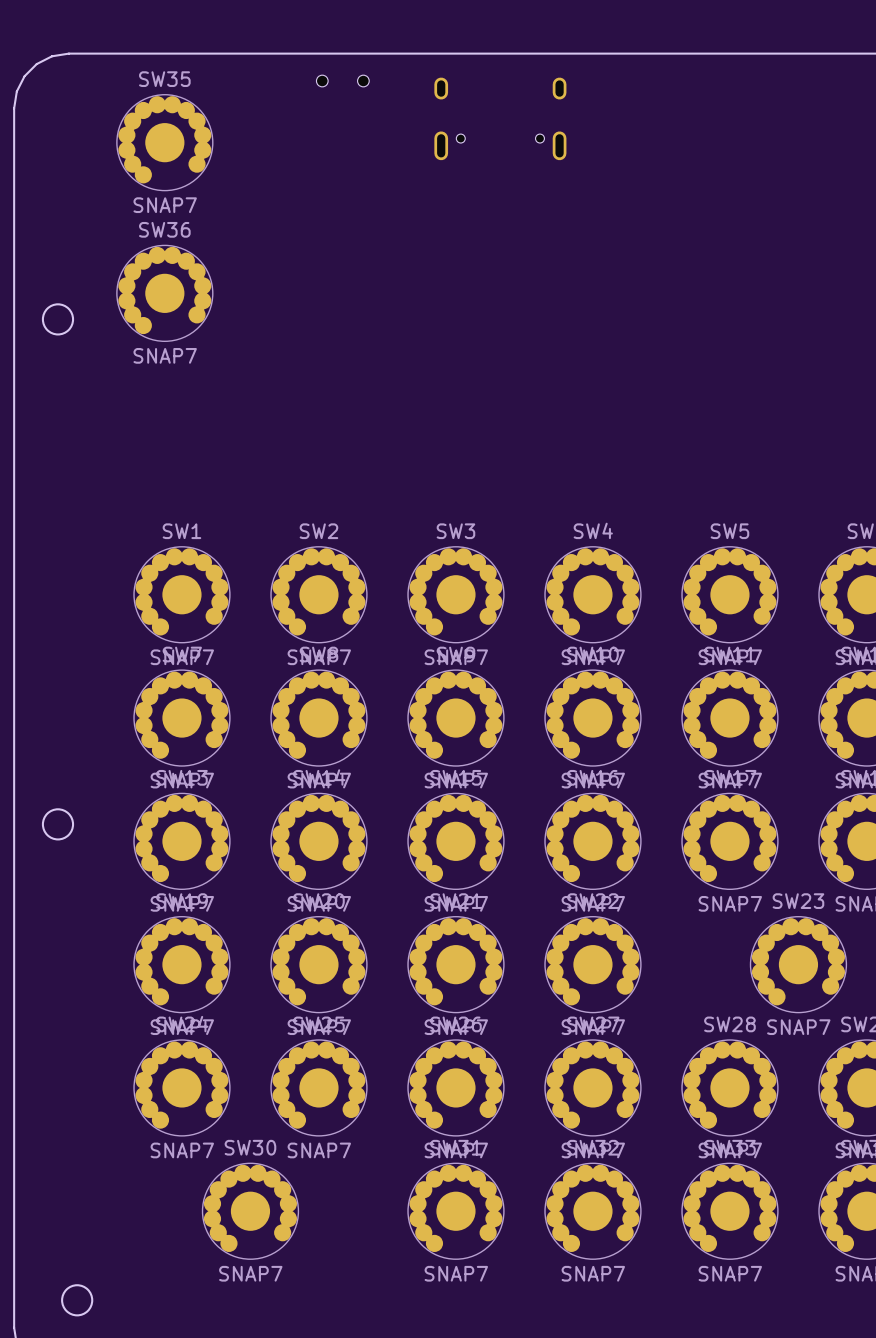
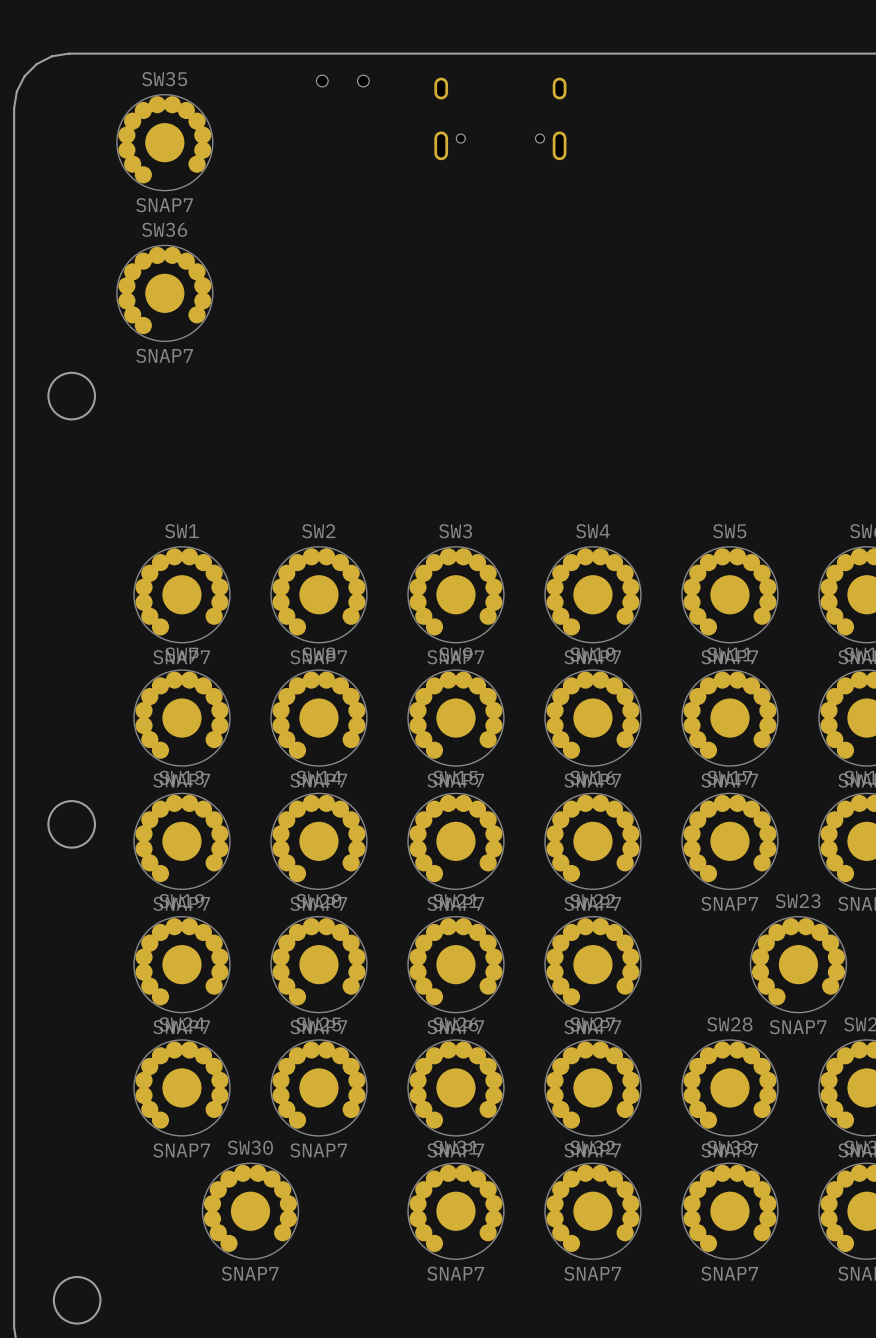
round board edge: [41, 303, 75, 336] -> none
round board edge: none -> [47, 371, 97, 421]
round board edge size: [41, 808, 75, 841] -> [47, 800, 97, 849]
round board edge size: [61, 1284, 94, 1317] -> [52, 1275, 102, 1325]

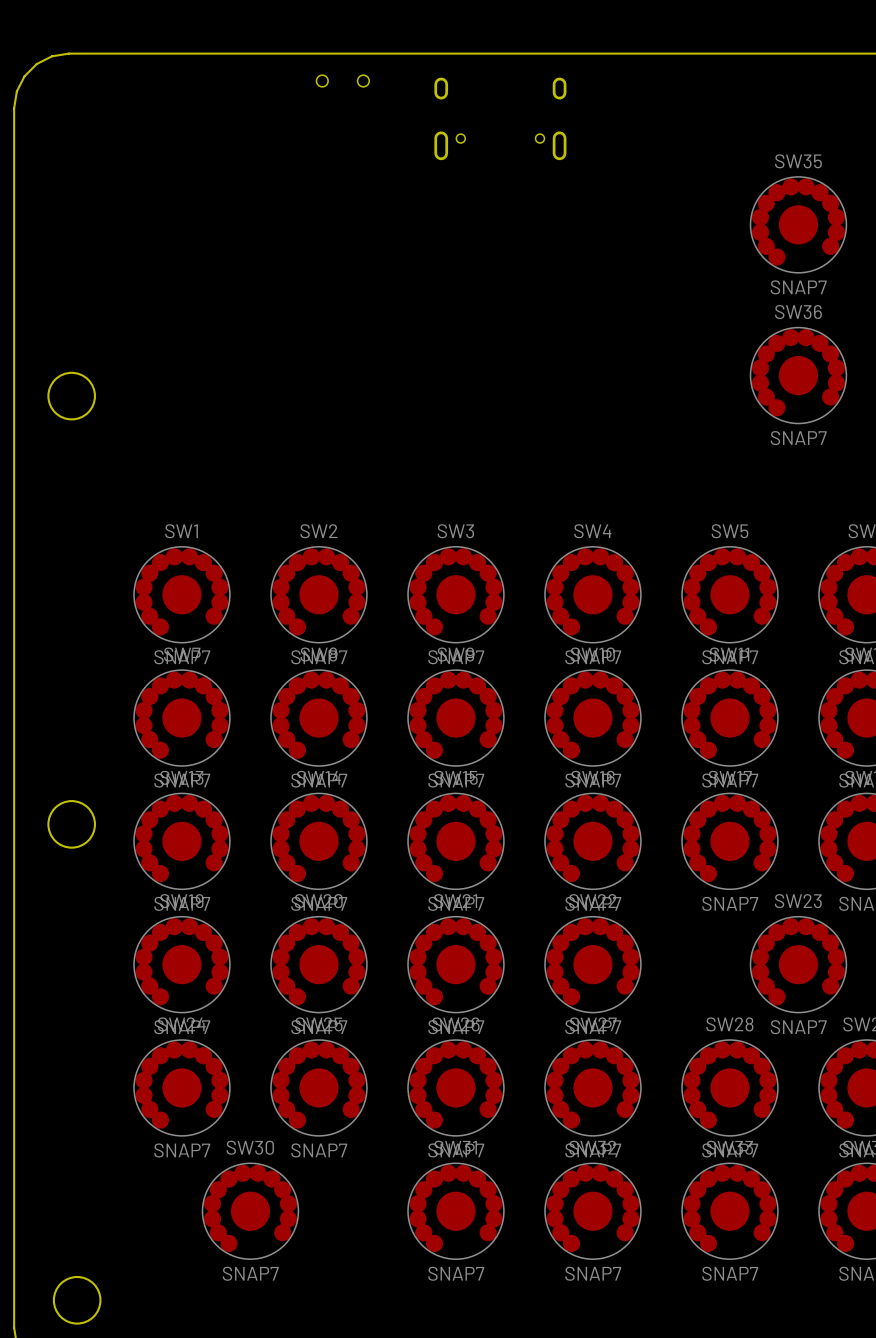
SW35 position: (164, 142) -> (798, 224)
SW36 position: (164, 293) -> (798, 375)

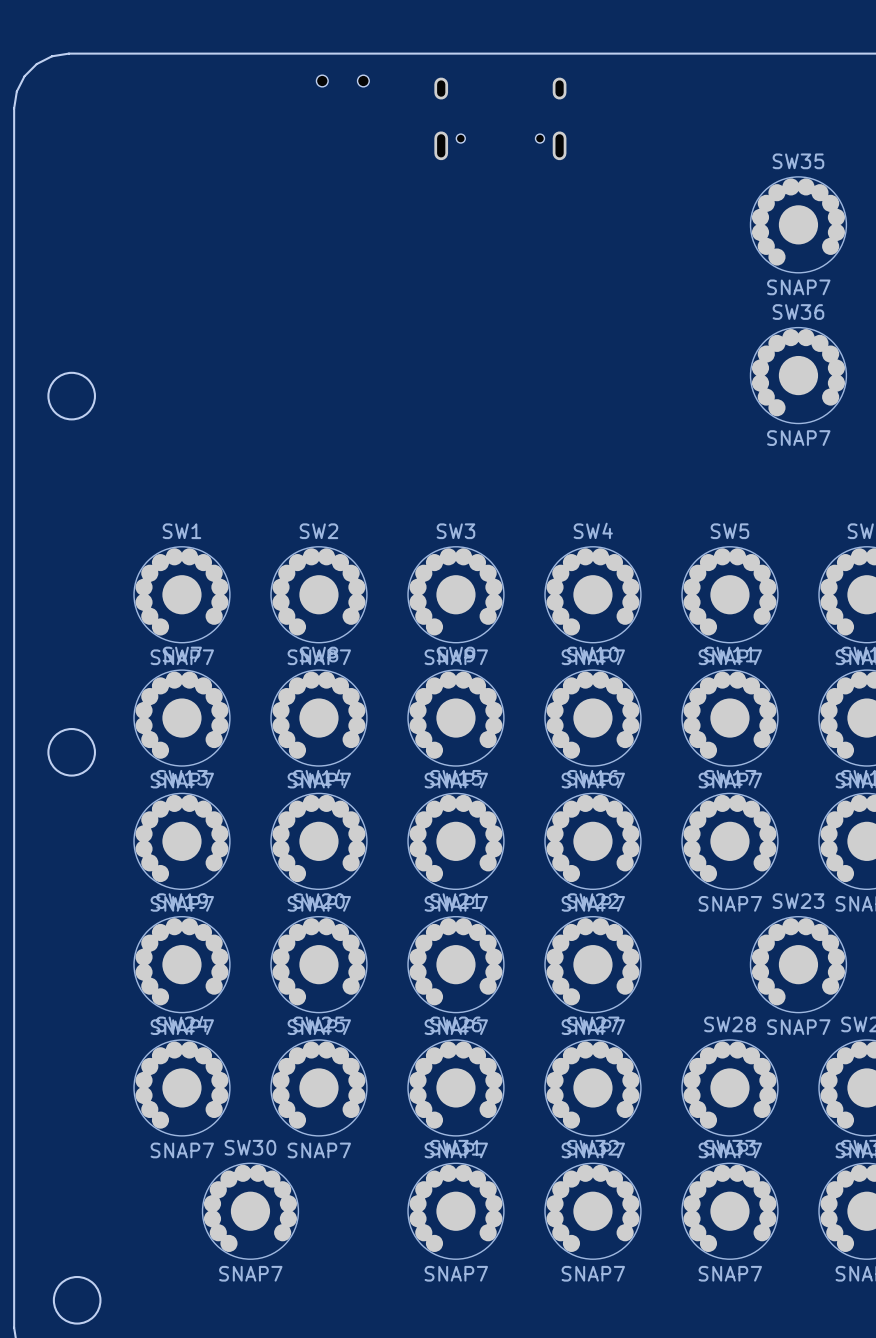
round board edge position: (71, 824) -> (71, 752)

